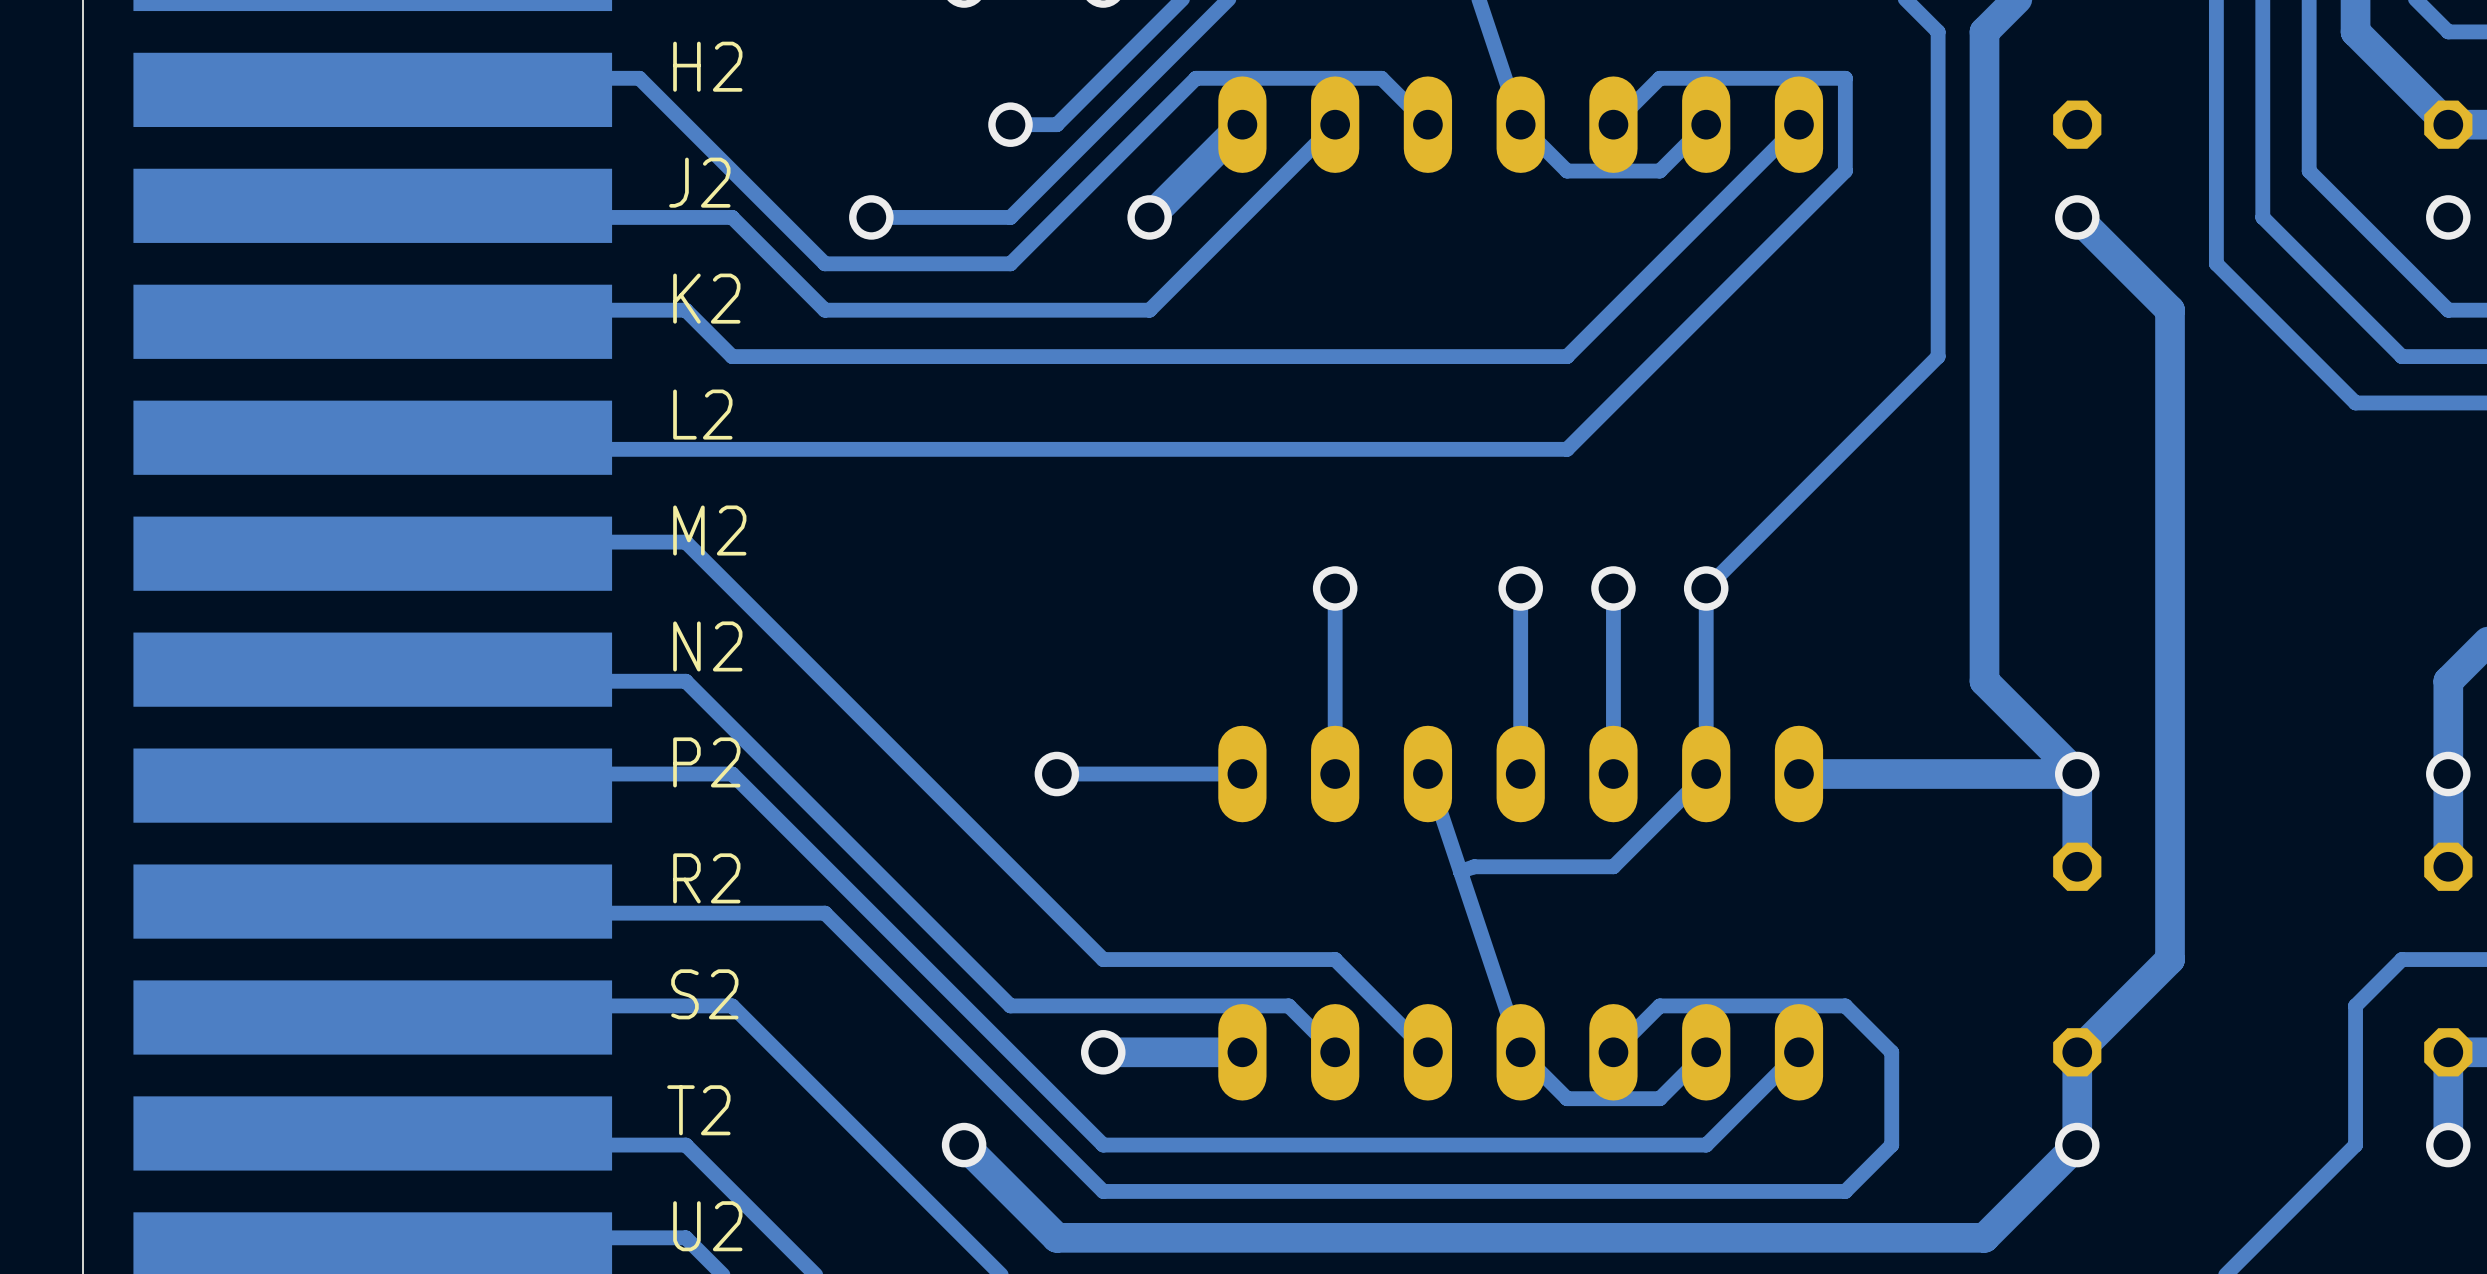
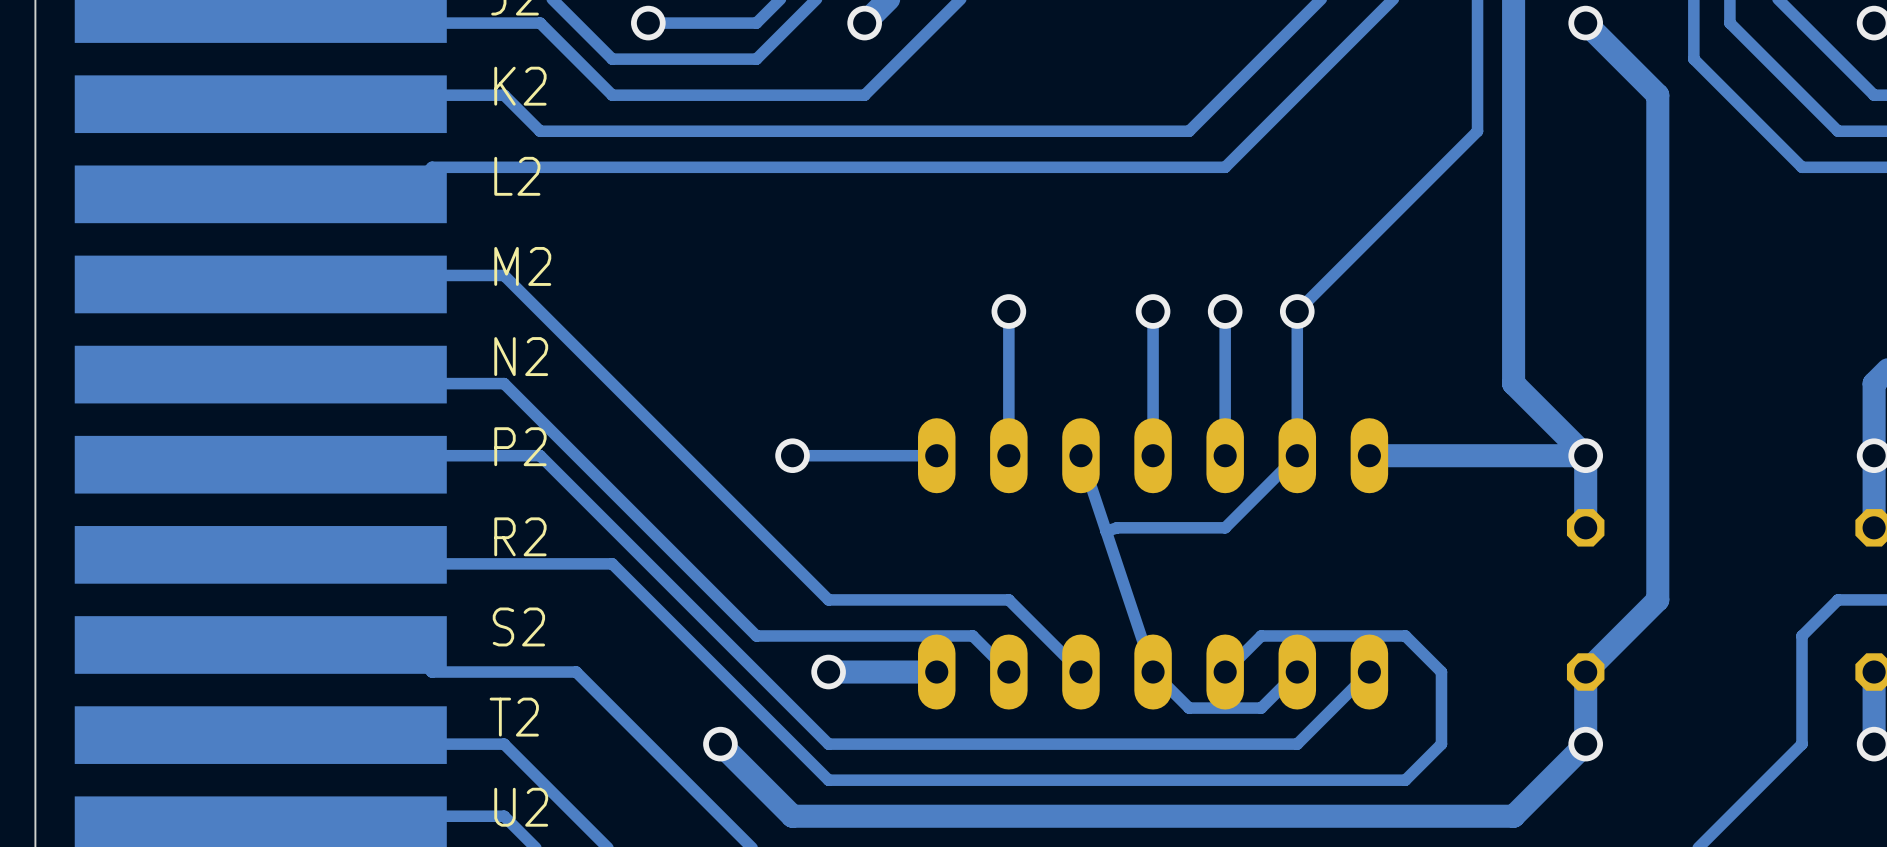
track: (1613, 402) (1567, 449) (546, 449) (512, 437) (372, 437) -> (1225, 167) (432, 167) (405, 193) (260, 194)
track: (557, 1017) (593, 1005) (732, 1005) (778, 1052) -> (404, 644) (432, 672) (576, 672)

